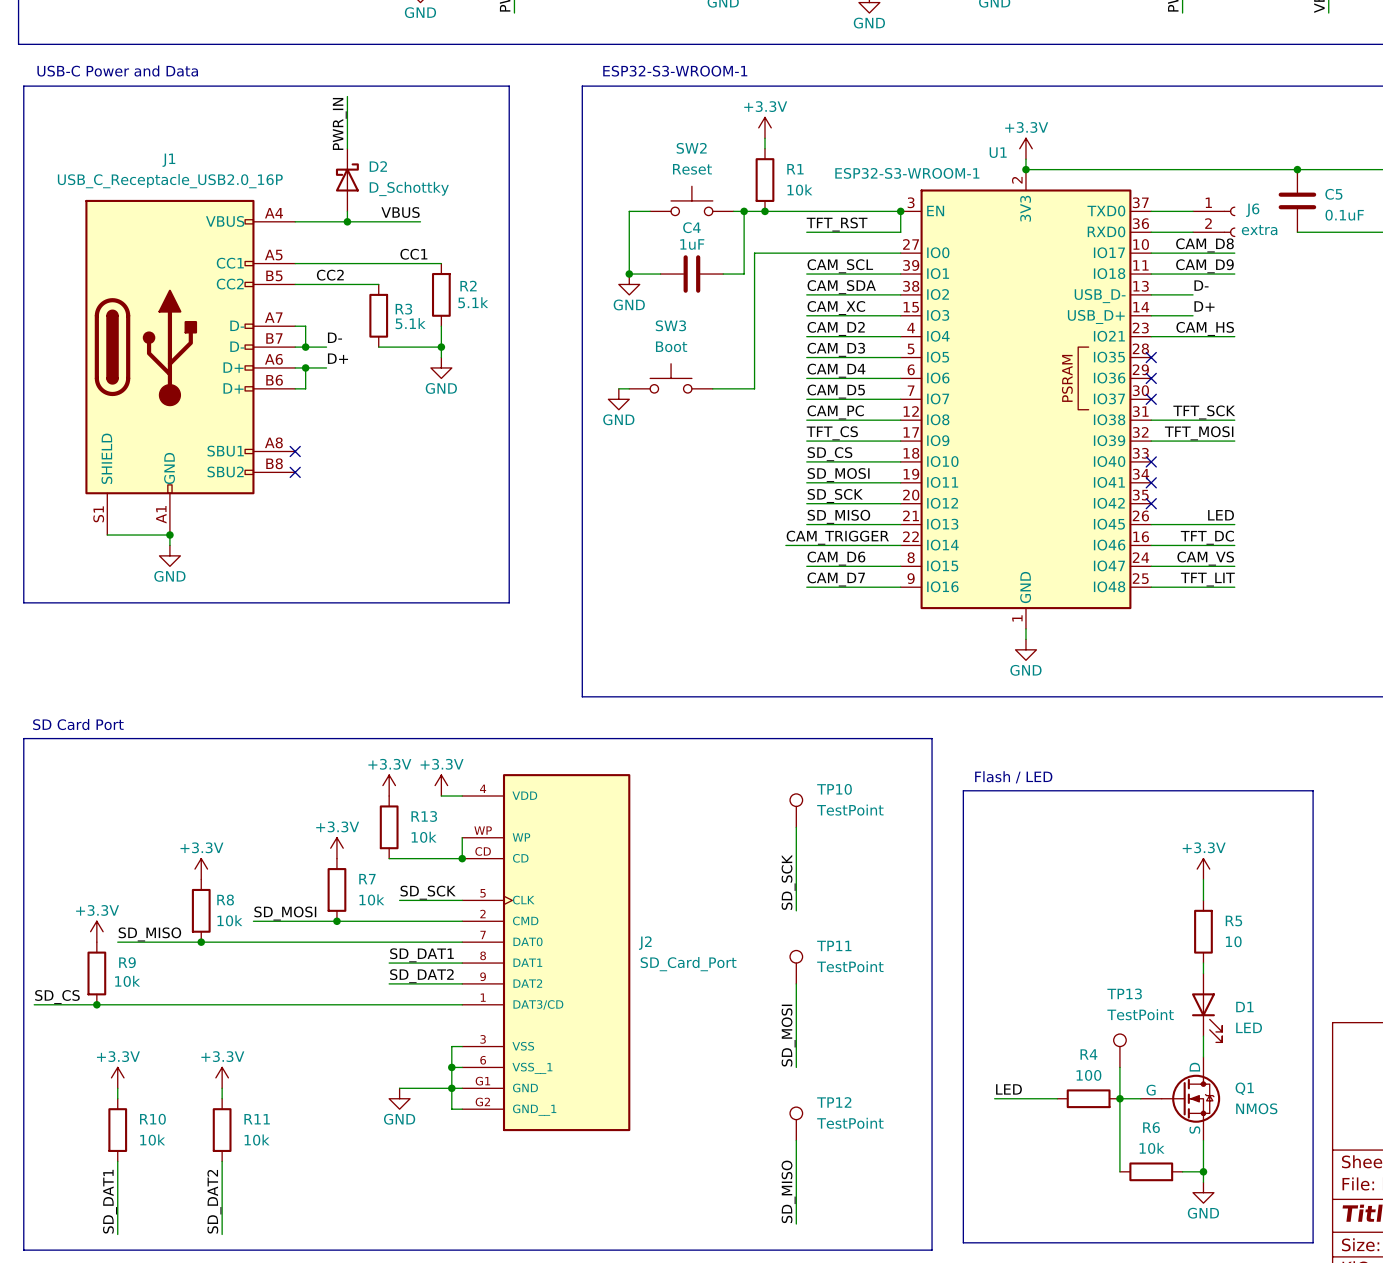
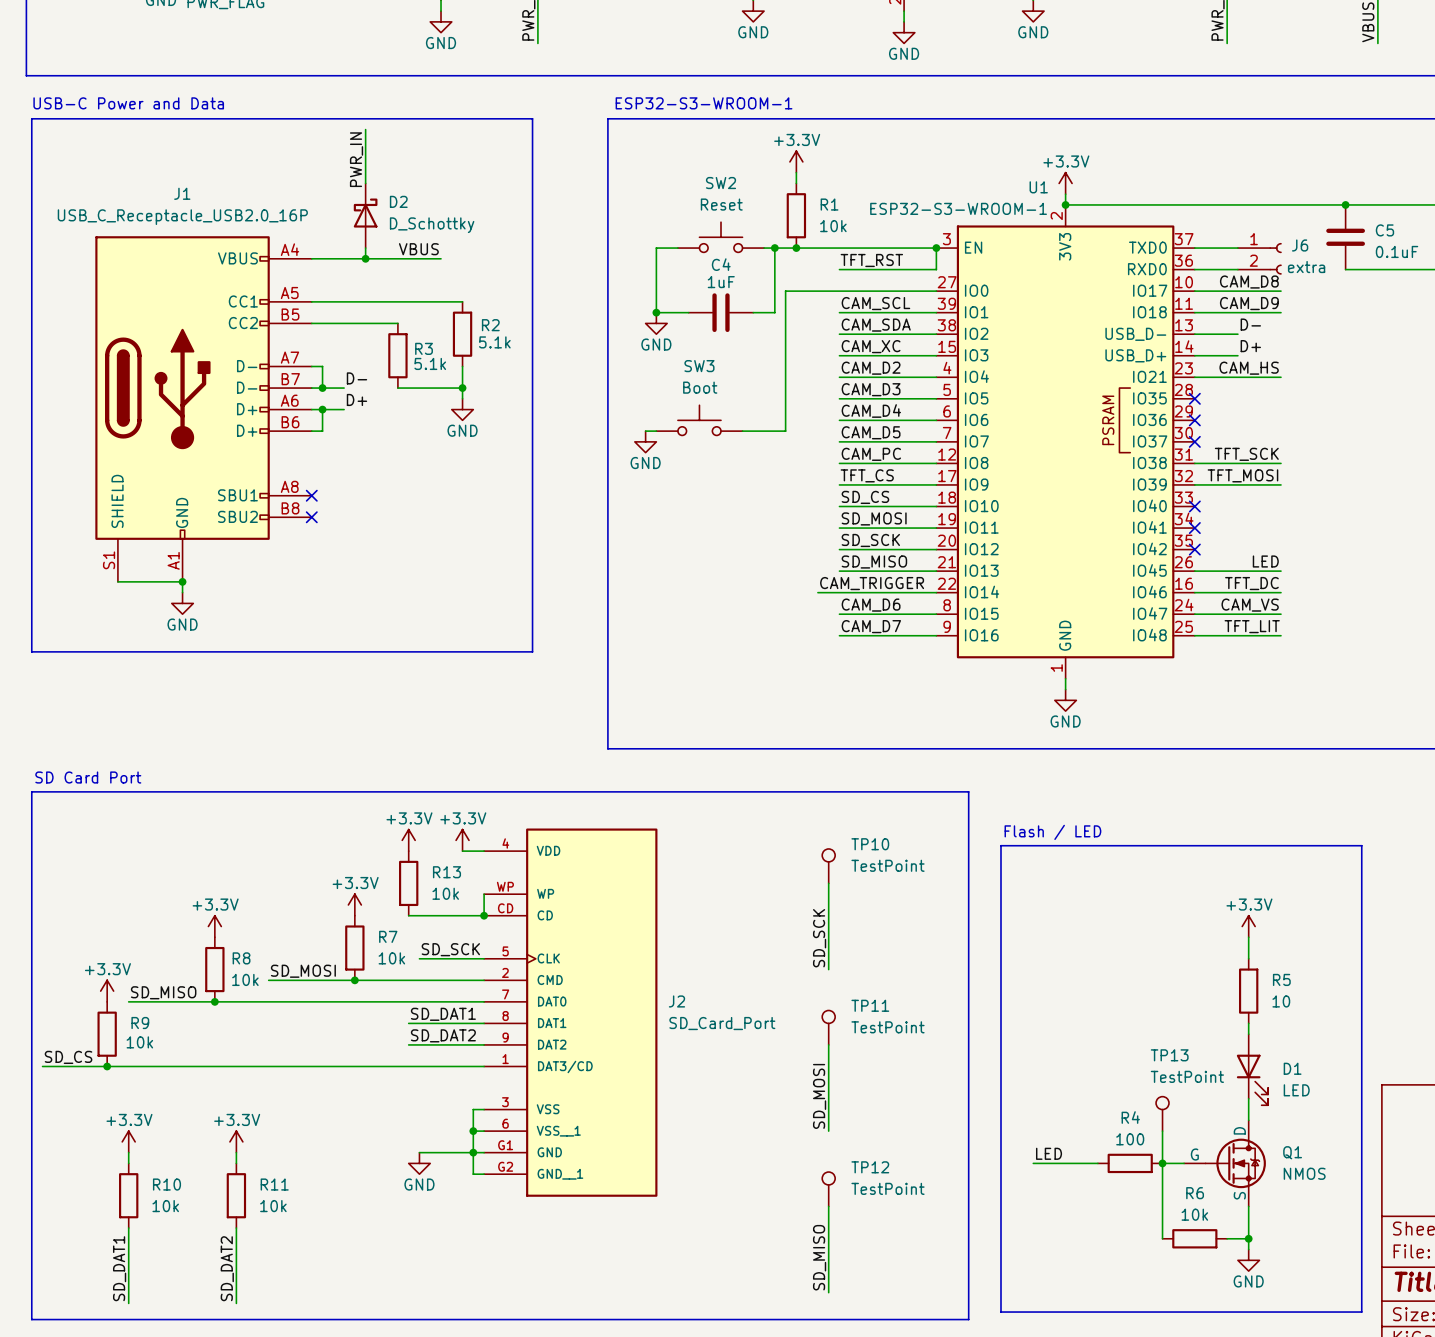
label: CC1 (413, 254) -> none
label: CC2 (330, 275) -> none

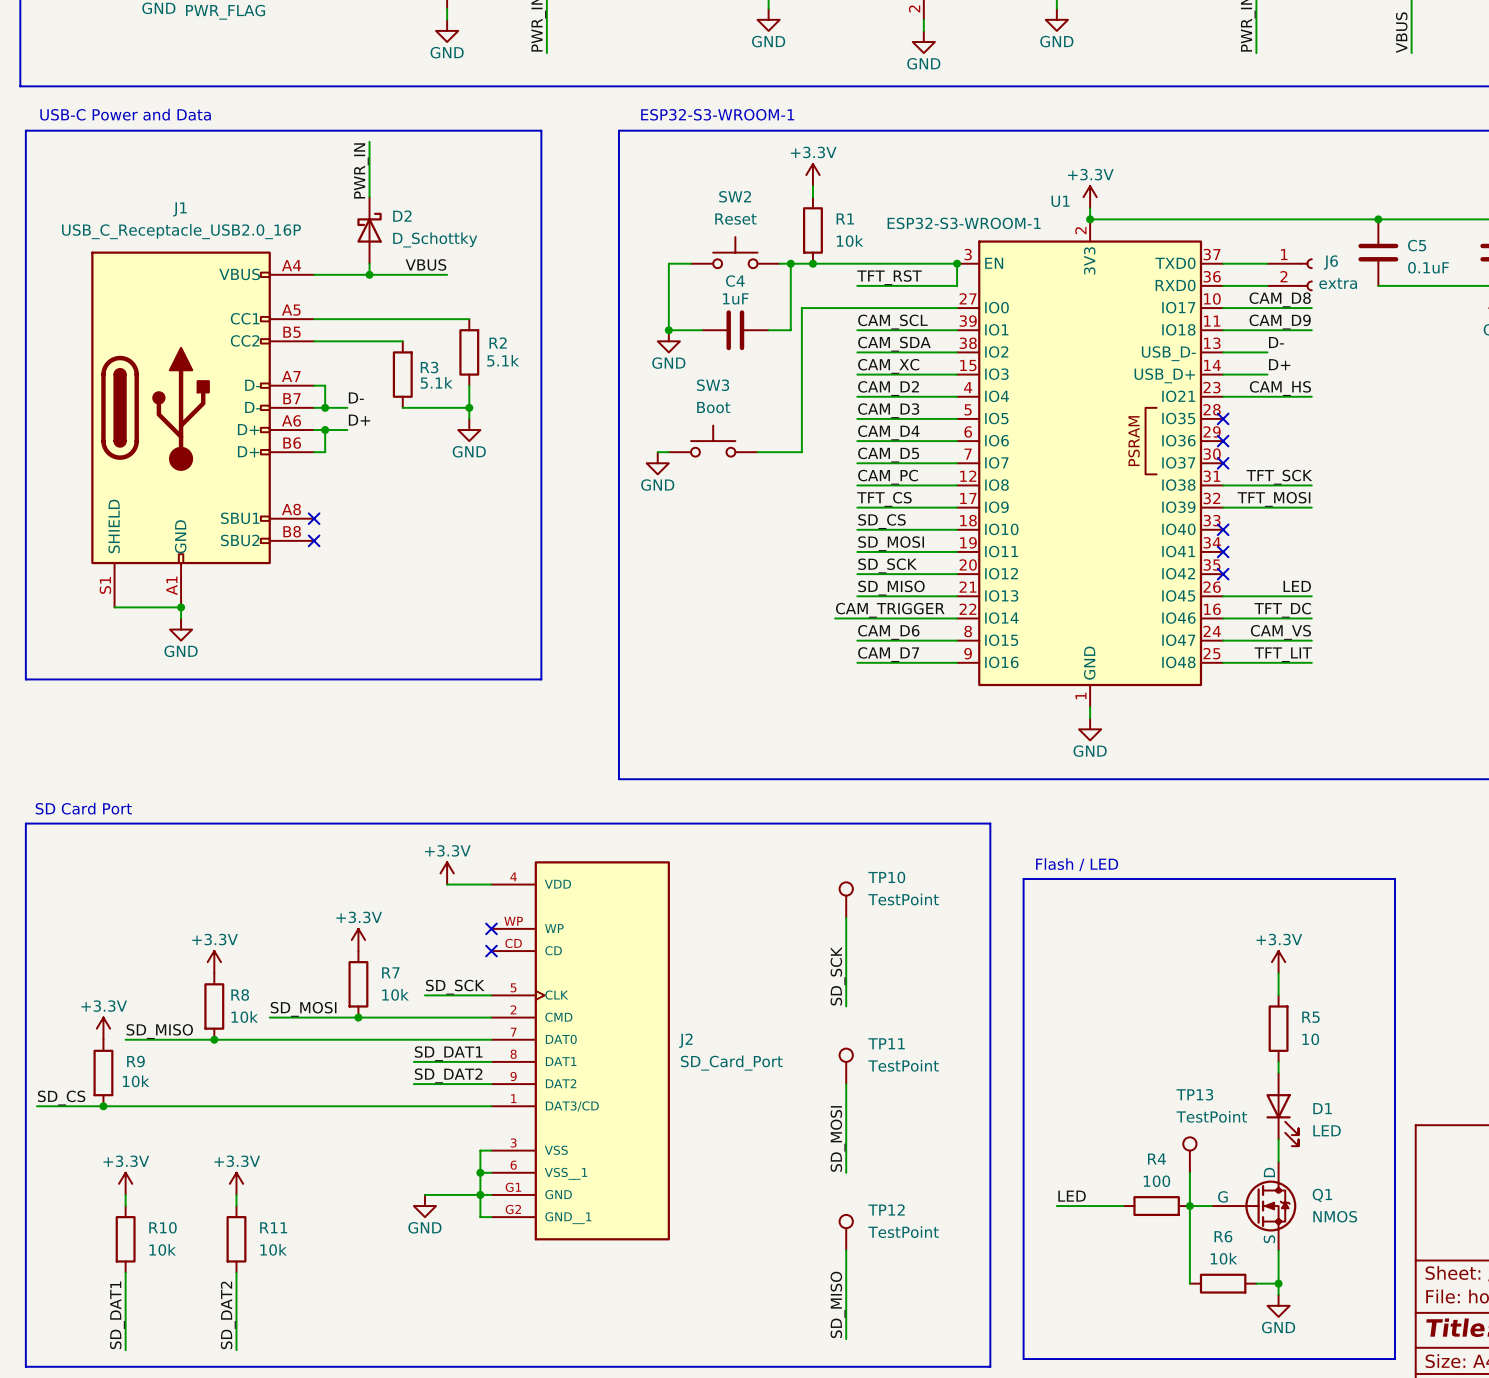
power symbol: +3.3V (408, 840) -> none
power symbol: none -> +3.3V (447, 873)
power symbol: +3.3V (462, 840) -> none
wire: none -> (447, 884) (469, 884)
R13: 10k (408, 883) -> none
wire: (484, 894) (484, 915) (408, 915) -> none
no-connect mark: none -> (491, 928)
junction: (484, 915) -> none
no-connect mark: none -> (491, 951)

